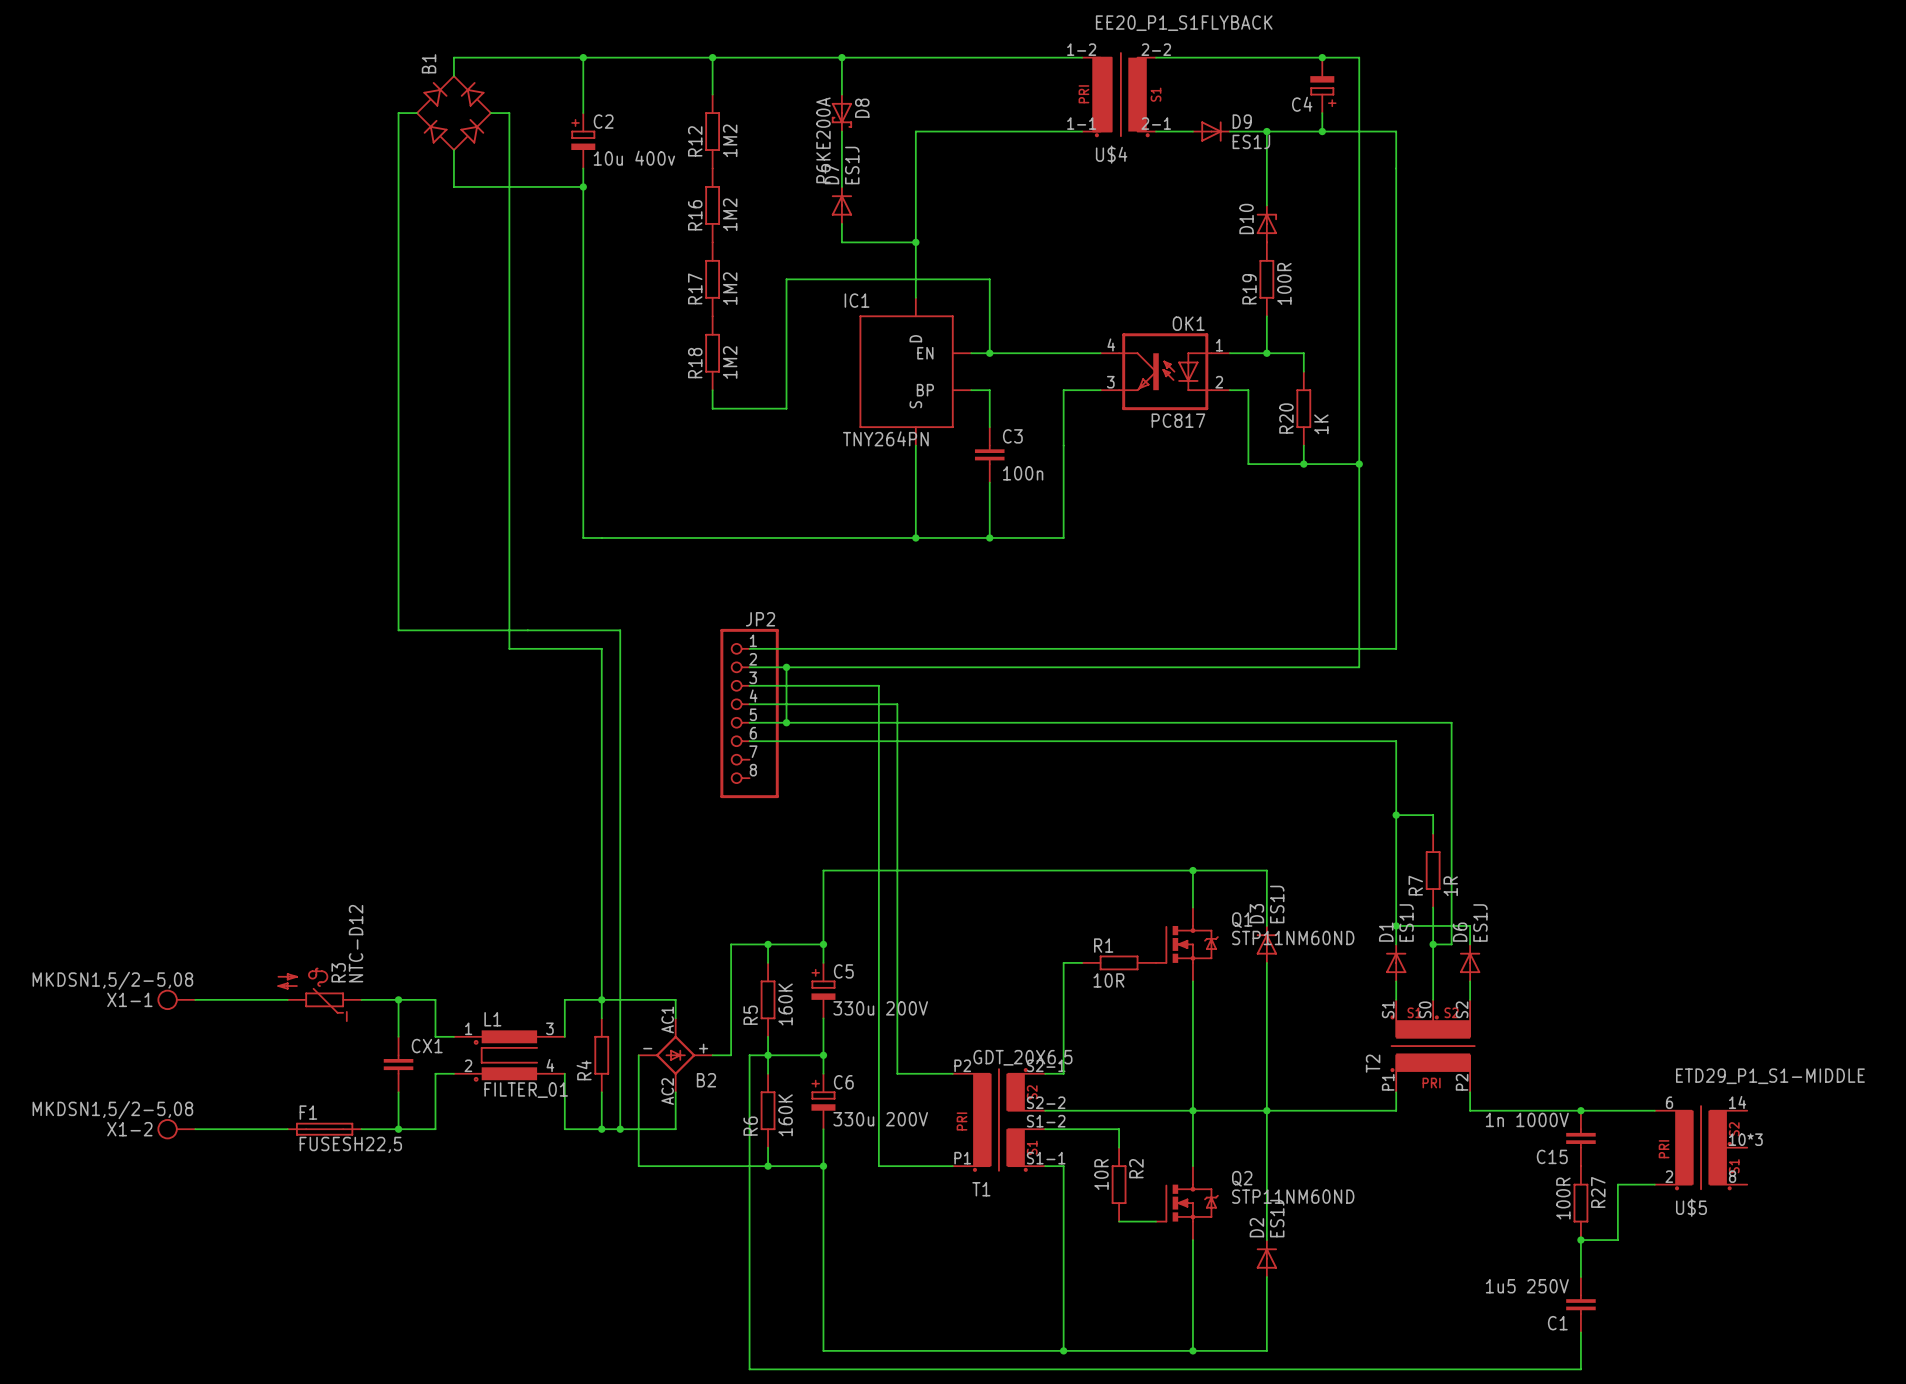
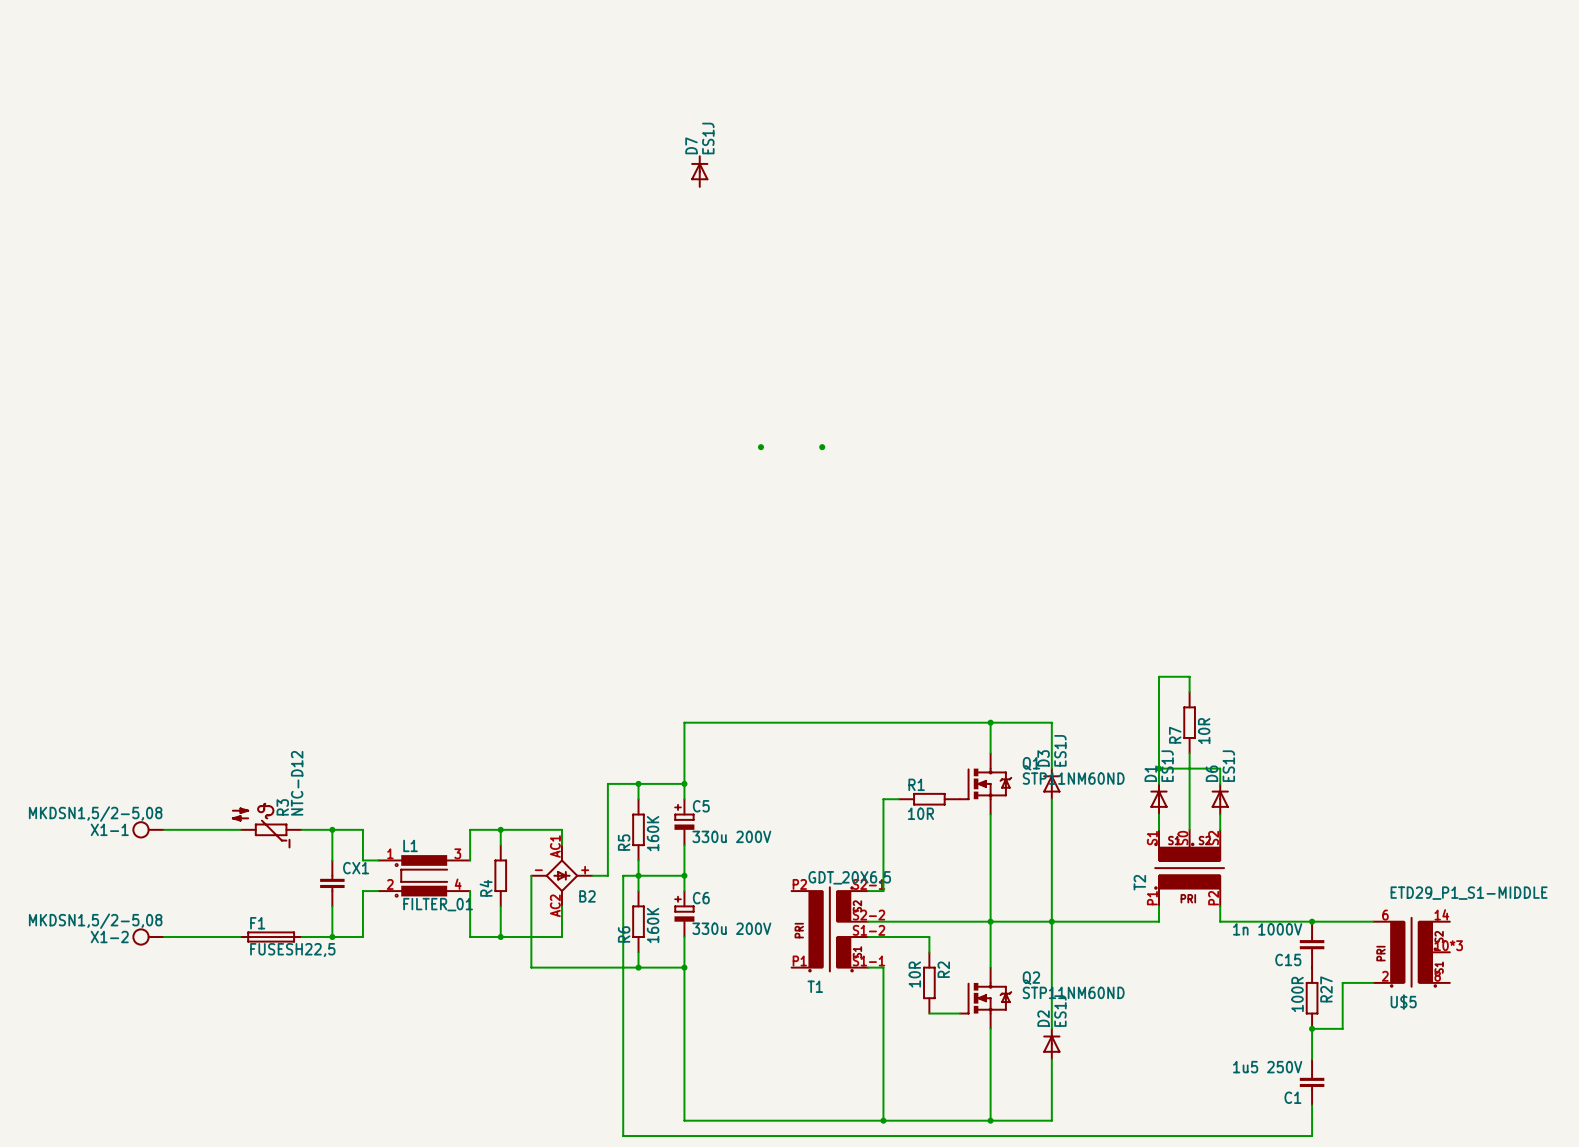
wire: (583, 57) (583, 113) -> none
junction: (583, 57) -> none
wire: (712, 57) (712, 94) -> none
junction: (712, 57) -> none
wire: (841, 57) (841, 94) -> none
junction: (841, 57) -> none
wire: (1082, 57) (453, 57) (453, 76) -> none
wire: (1156, 57) (1359, 57) (1359, 667) (749, 667) -> none
junction: (1322, 57) -> none
C4: (1322, 85) -> none
U$4: EE20_P1_S1FLYBACK (1119, 94) -> none
wire: (417, 113) (398, 113) (398, 630) (620, 630) (620, 1129) -> none
B1: (453, 113) -> none
wire: (490, 113) (509, 113) (509, 648) (601, 648) (601, 999) -> none
D8: P6KE200A (841, 113) -> none
wire: (1322, 113) (1322, 131) -> none
R12: 1M2 (712, 131) -> none
wire: (841, 131) (841, 186) -> none
wire: (1082, 131) (915, 131) (915, 297) -> none
wire: (1156, 131) (1192, 131) -> none
D9: ES1J (1211, 131) -> none
wire: (1229, 131) (1396, 131) (1396, 648) (749, 648) -> none
wire: (1266, 131) (1266, 205) -> none
junction: (1266, 131) -> none
junction: (1322, 131) -> none
C2: 10u 400v (583, 140) -> none
wire: (453, 150) (453, 186) (583, 186) -> none
wire: (583, 168) (583, 537) (1063, 537) (1063, 390) (1100, 390) -> none
junction: (583, 186) -> none
R16: 1M2 (712, 205) -> none
wire: (841, 223) (841, 242) (915, 242) -> none
D10: (1266, 223) -> none
junction: (915, 242) -> none
R17: 1M2 (712, 279) -> none
R19: 100R (1266, 279) -> none
wire: (1266, 316) (1266, 353) -> none
R18: 1M2 (712, 353) -> none
wire: (971, 353) (1100, 353) -> none
wire: (989, 353) (989, 279) (786, 279) (786, 408) (712, 408) (712, 390) -> none
junction: (989, 353) -> none
wire: (1229, 353) (1303, 353) (1303, 371) -> none
junction: (1266, 353) -> none
IC1: TNY264PN (915, 371) -> none
OK1: PC817 (1165, 371) -> none
wire: (971, 390) (989, 390) (989, 427) -> none
wire: (1229, 390) (1248, 390) (1248, 464) (1359, 464) -> none
R20: 1K (1303, 408) -> none
wire: (915, 445) (915, 537) -> none
wire: (1303, 445) (1303, 464) -> none
C3: 100n (989, 454) -> none
junction: (1303, 464) -> none
junction: (1359, 464) -> none
wire: (989, 482) (989, 537) -> none
wire: (786, 667) (786, 722) -> none
junction: (786, 667) -> none
wire: (749, 685) (878, 685) (878, 1166) (952, 1166) -> none
wire: (749, 704) (897, 704) (897, 1073) (952, 1073) -> none
JP2: (749, 713) -> none
wire: (749, 722) (1451, 722) (1451, 944) (1433, 944) -> none
junction: (786, 722) -> none
wire: (749, 741) (1396, 741) (1396, 815) -> none
junction: (1396, 815) -> none
R7 value: 1R (1450, 886) -> 10R (1204, 731)
junction: (1433, 944) -> none
junction: (620, 1129) -> none

